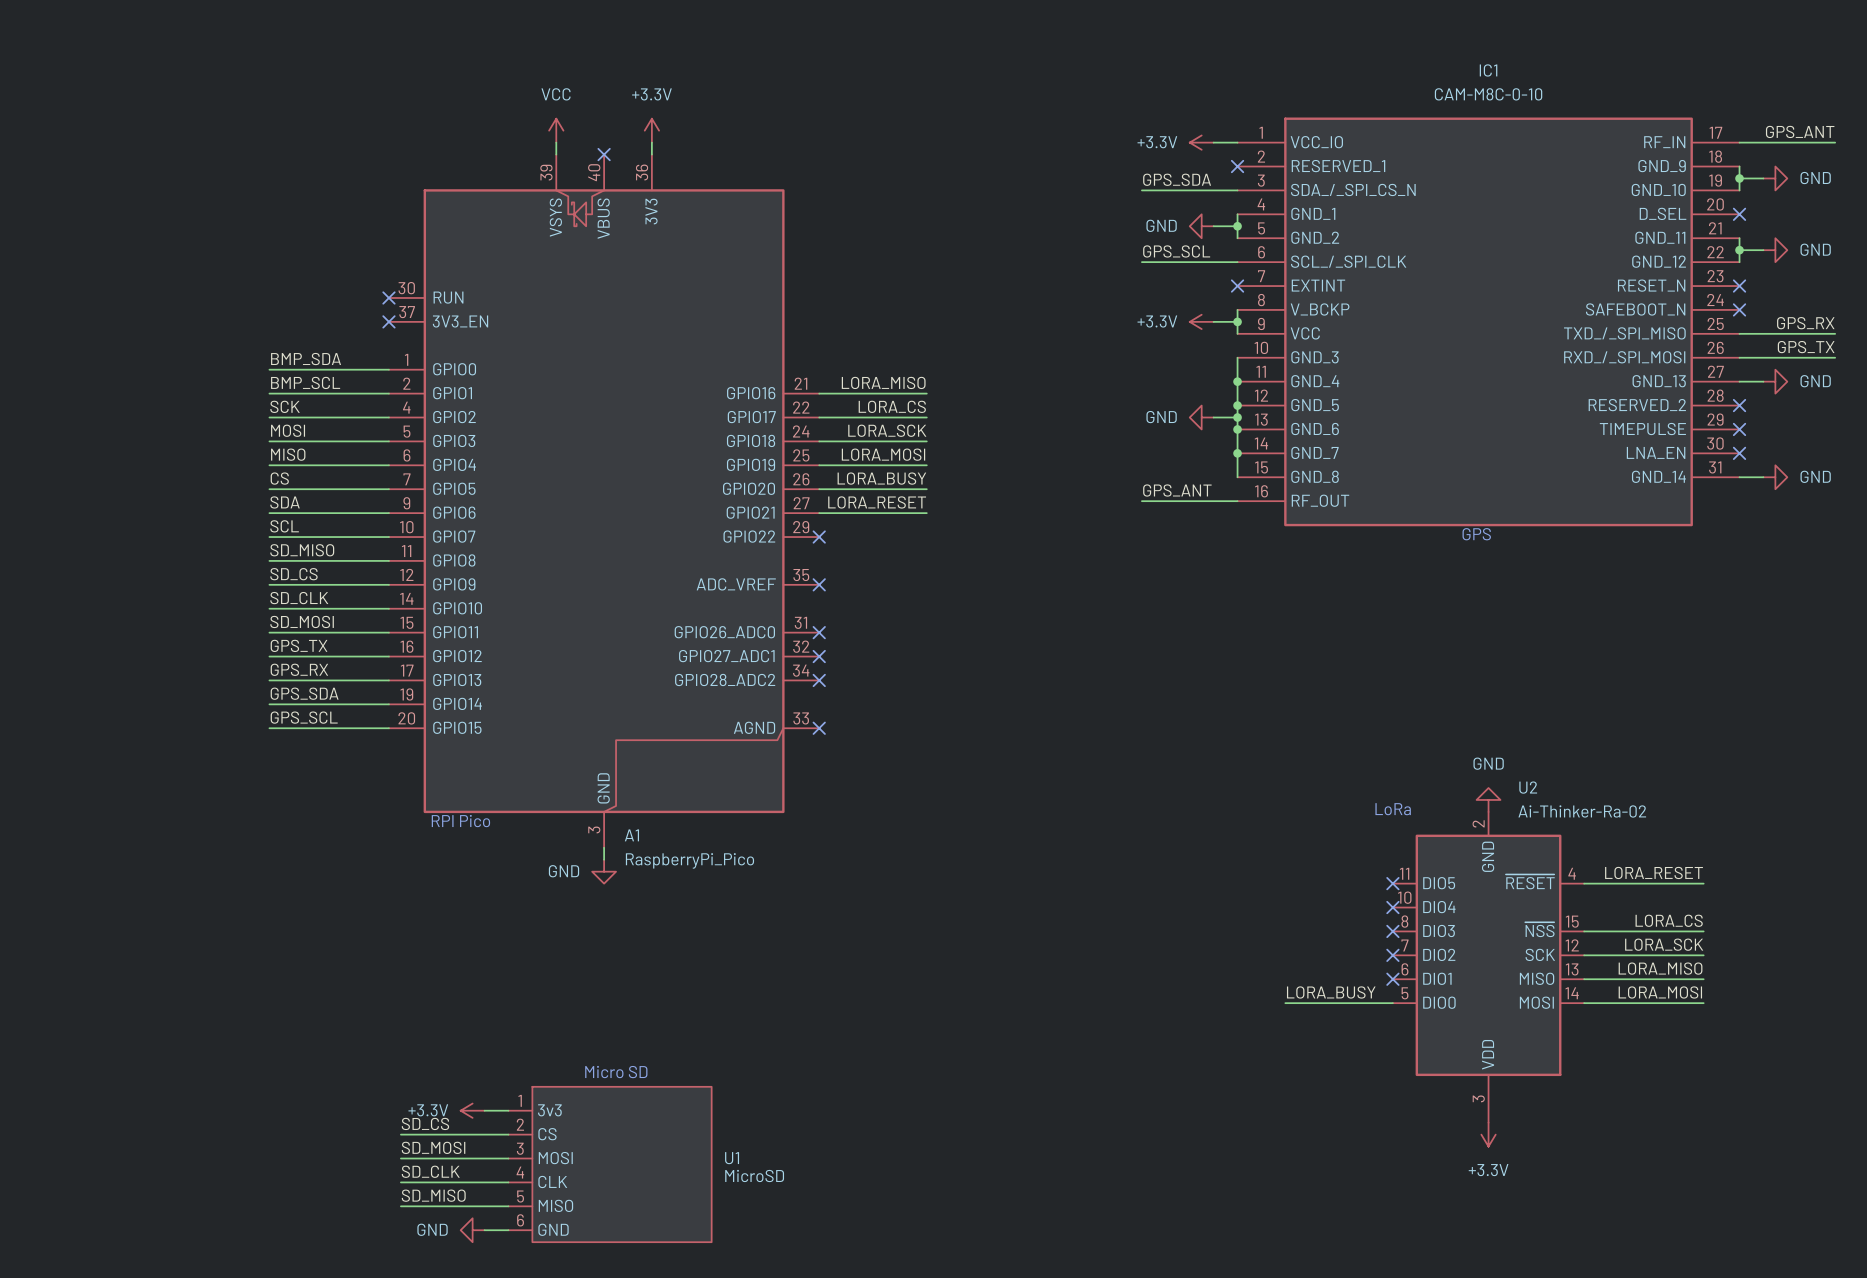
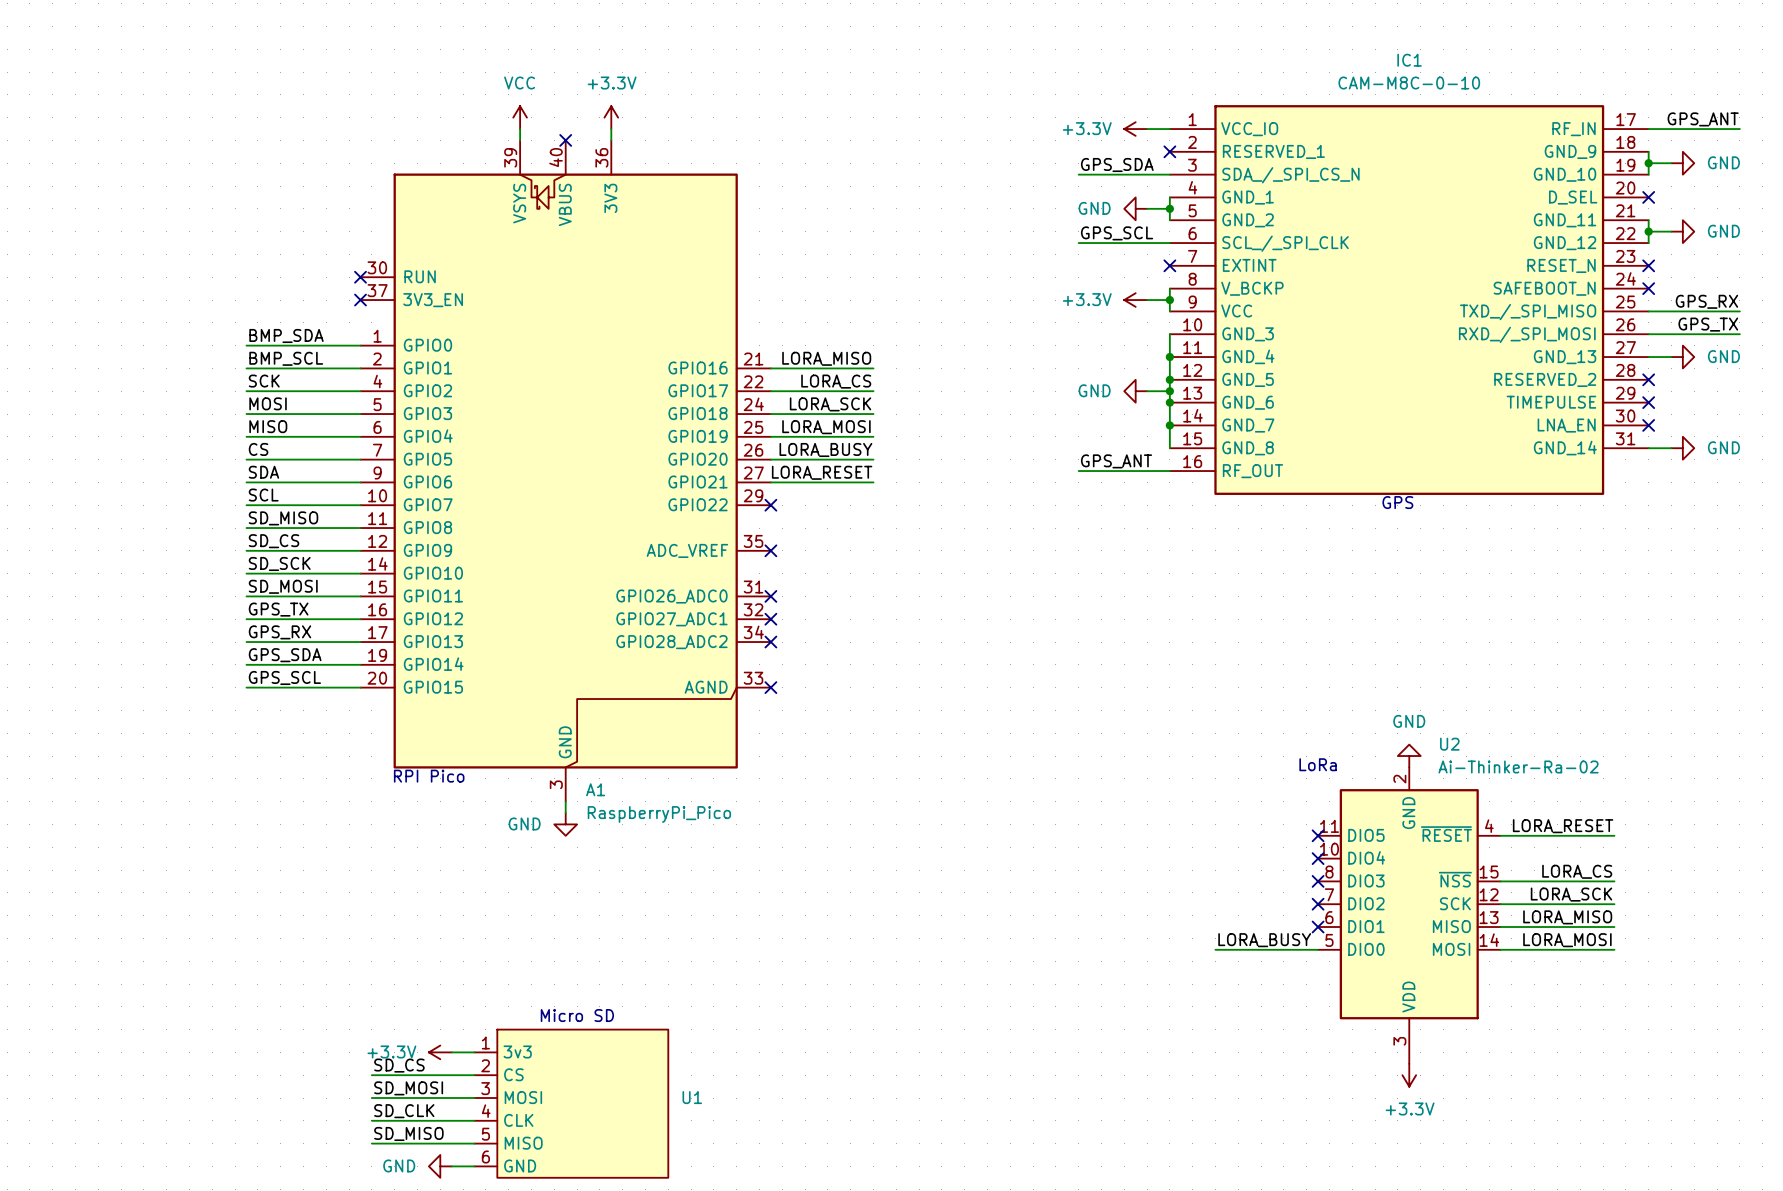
label: SD_CLK (299, 598) -> SD_SCK (279, 563)
U1 value: MicroSD (754, 1175) -> none

